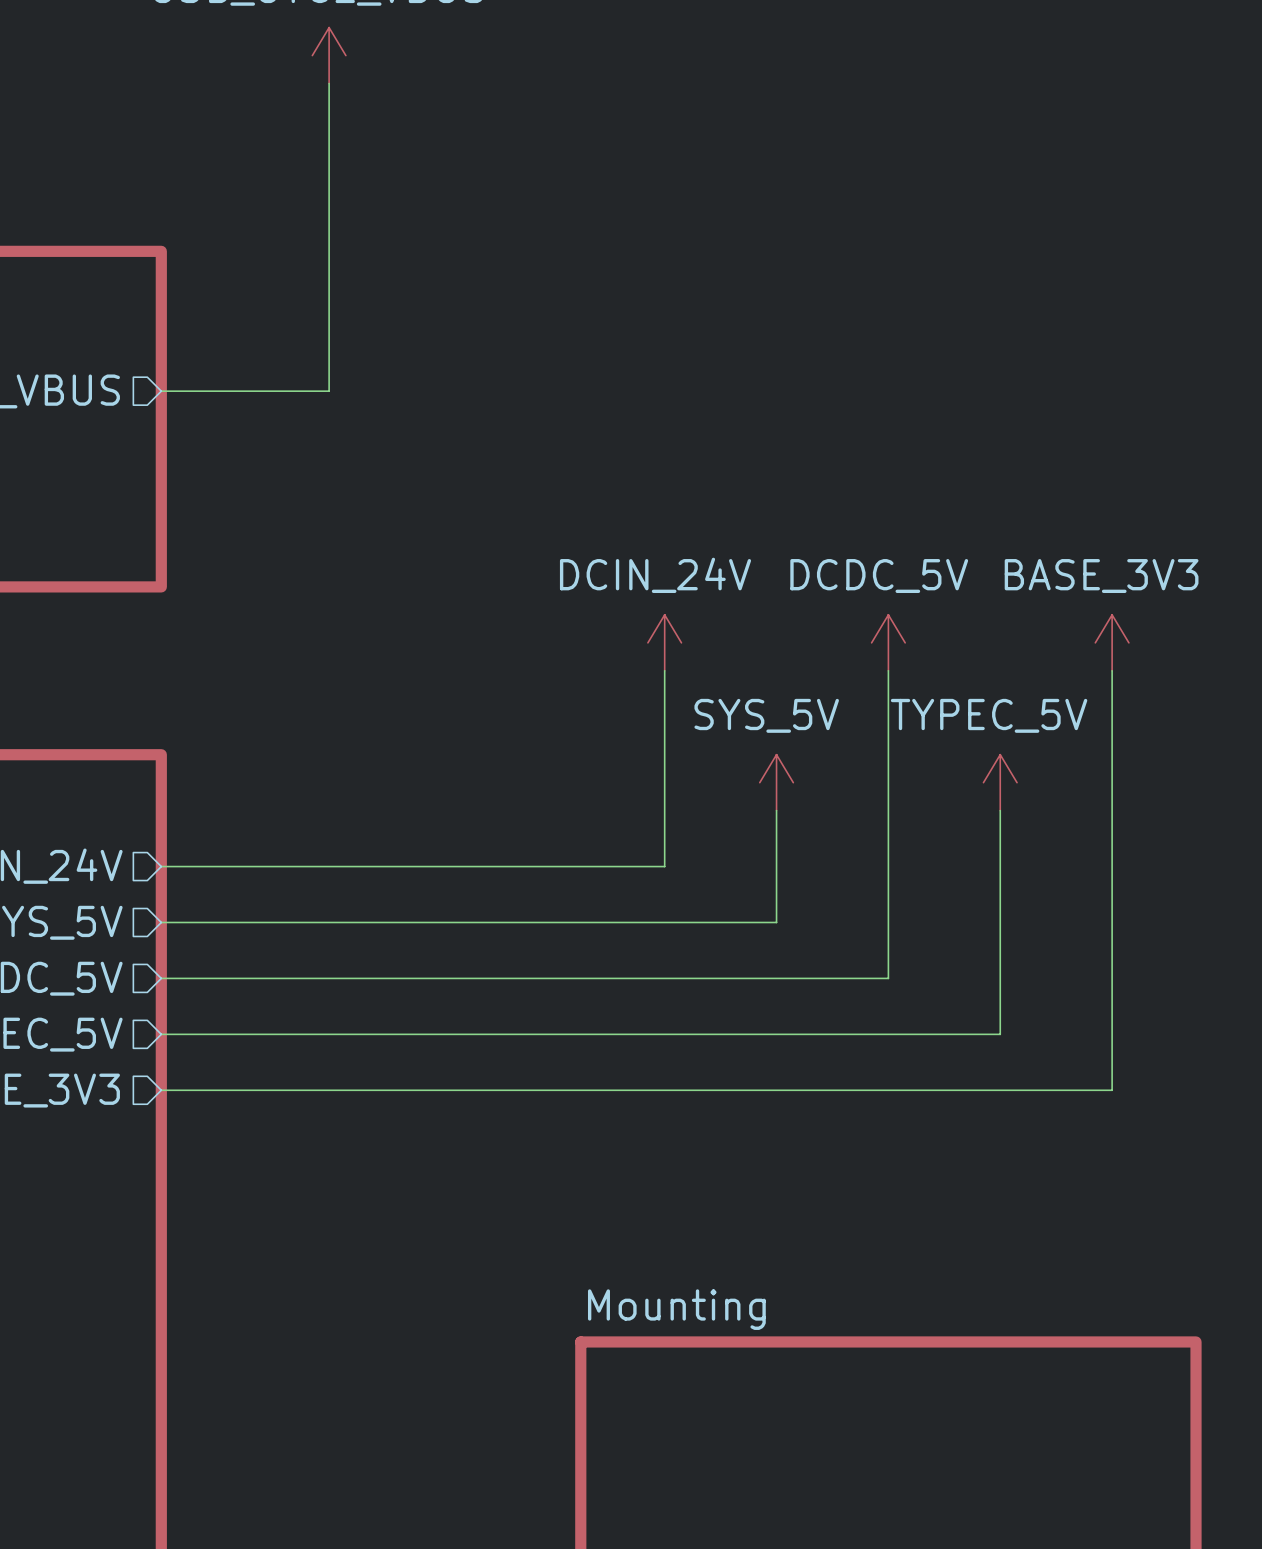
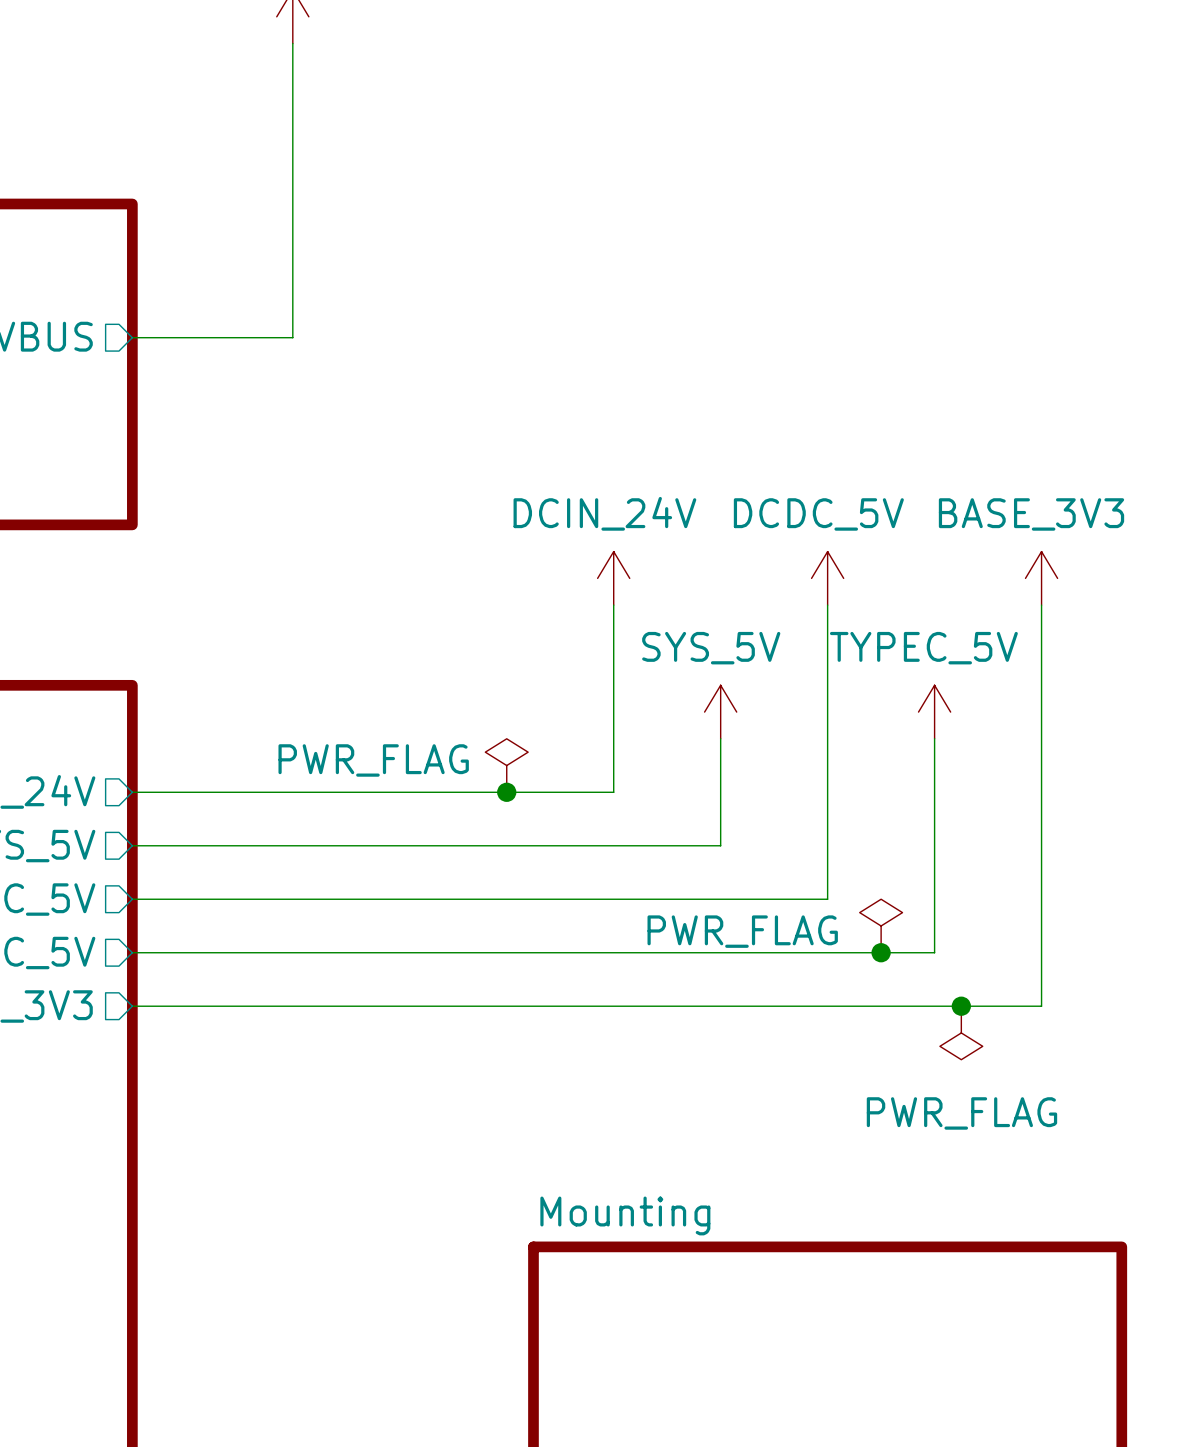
power symbol: none -> PWR_FLAG (506, 765)
junction: none -> (506, 792)
power symbol: none -> PWR_FLAG (881, 925)
junction: none -> (881, 952)
junction: none -> (961, 1006)
power symbol: none -> PWR_FLAG (961, 1032)

